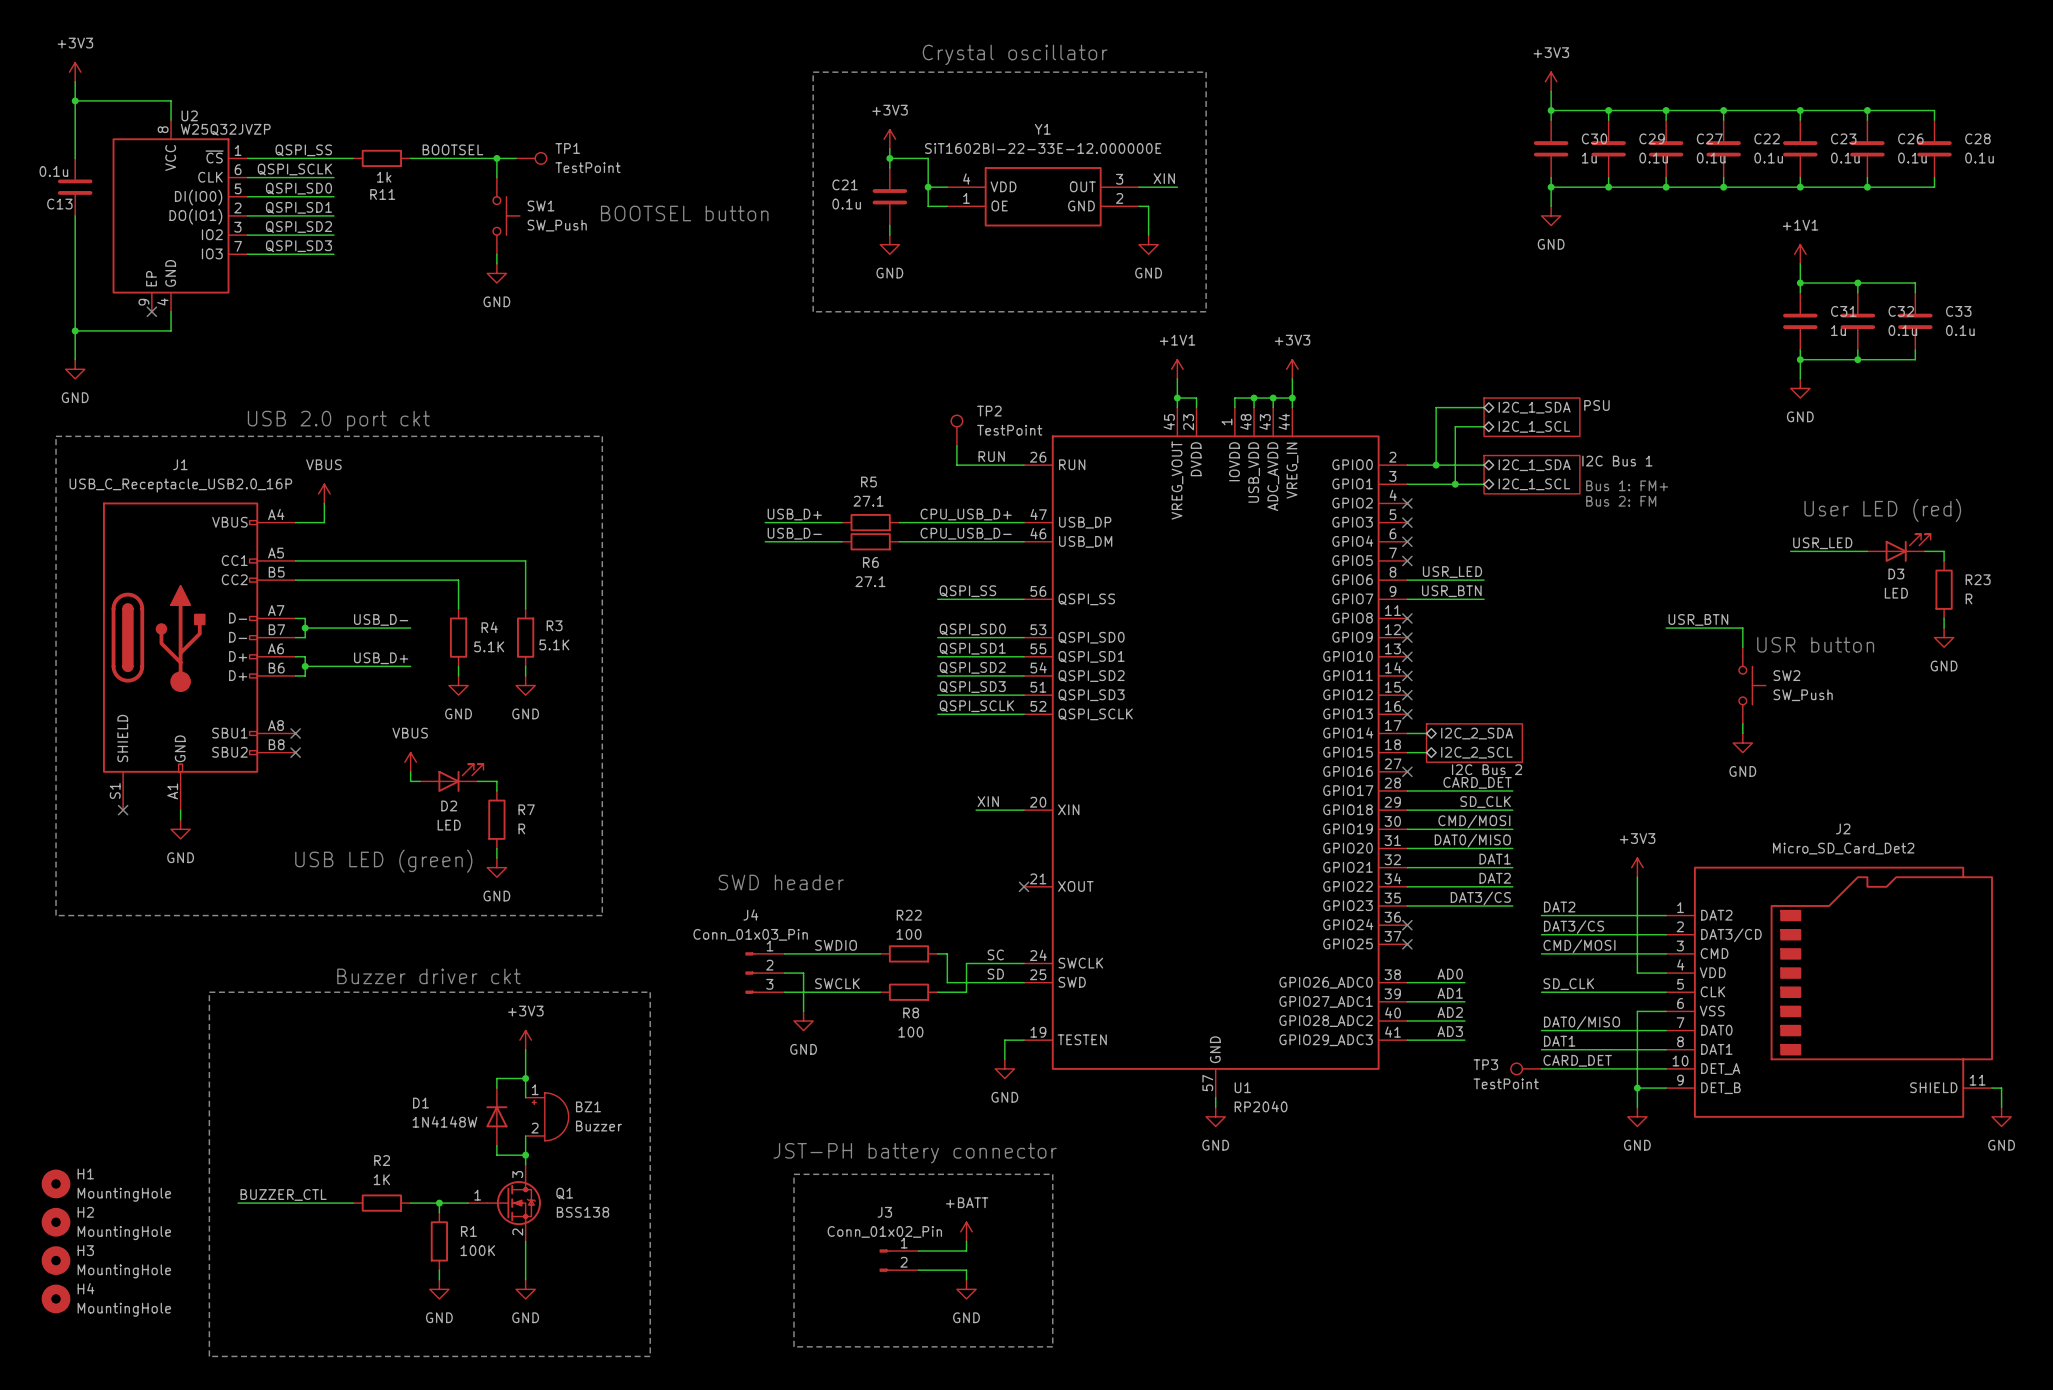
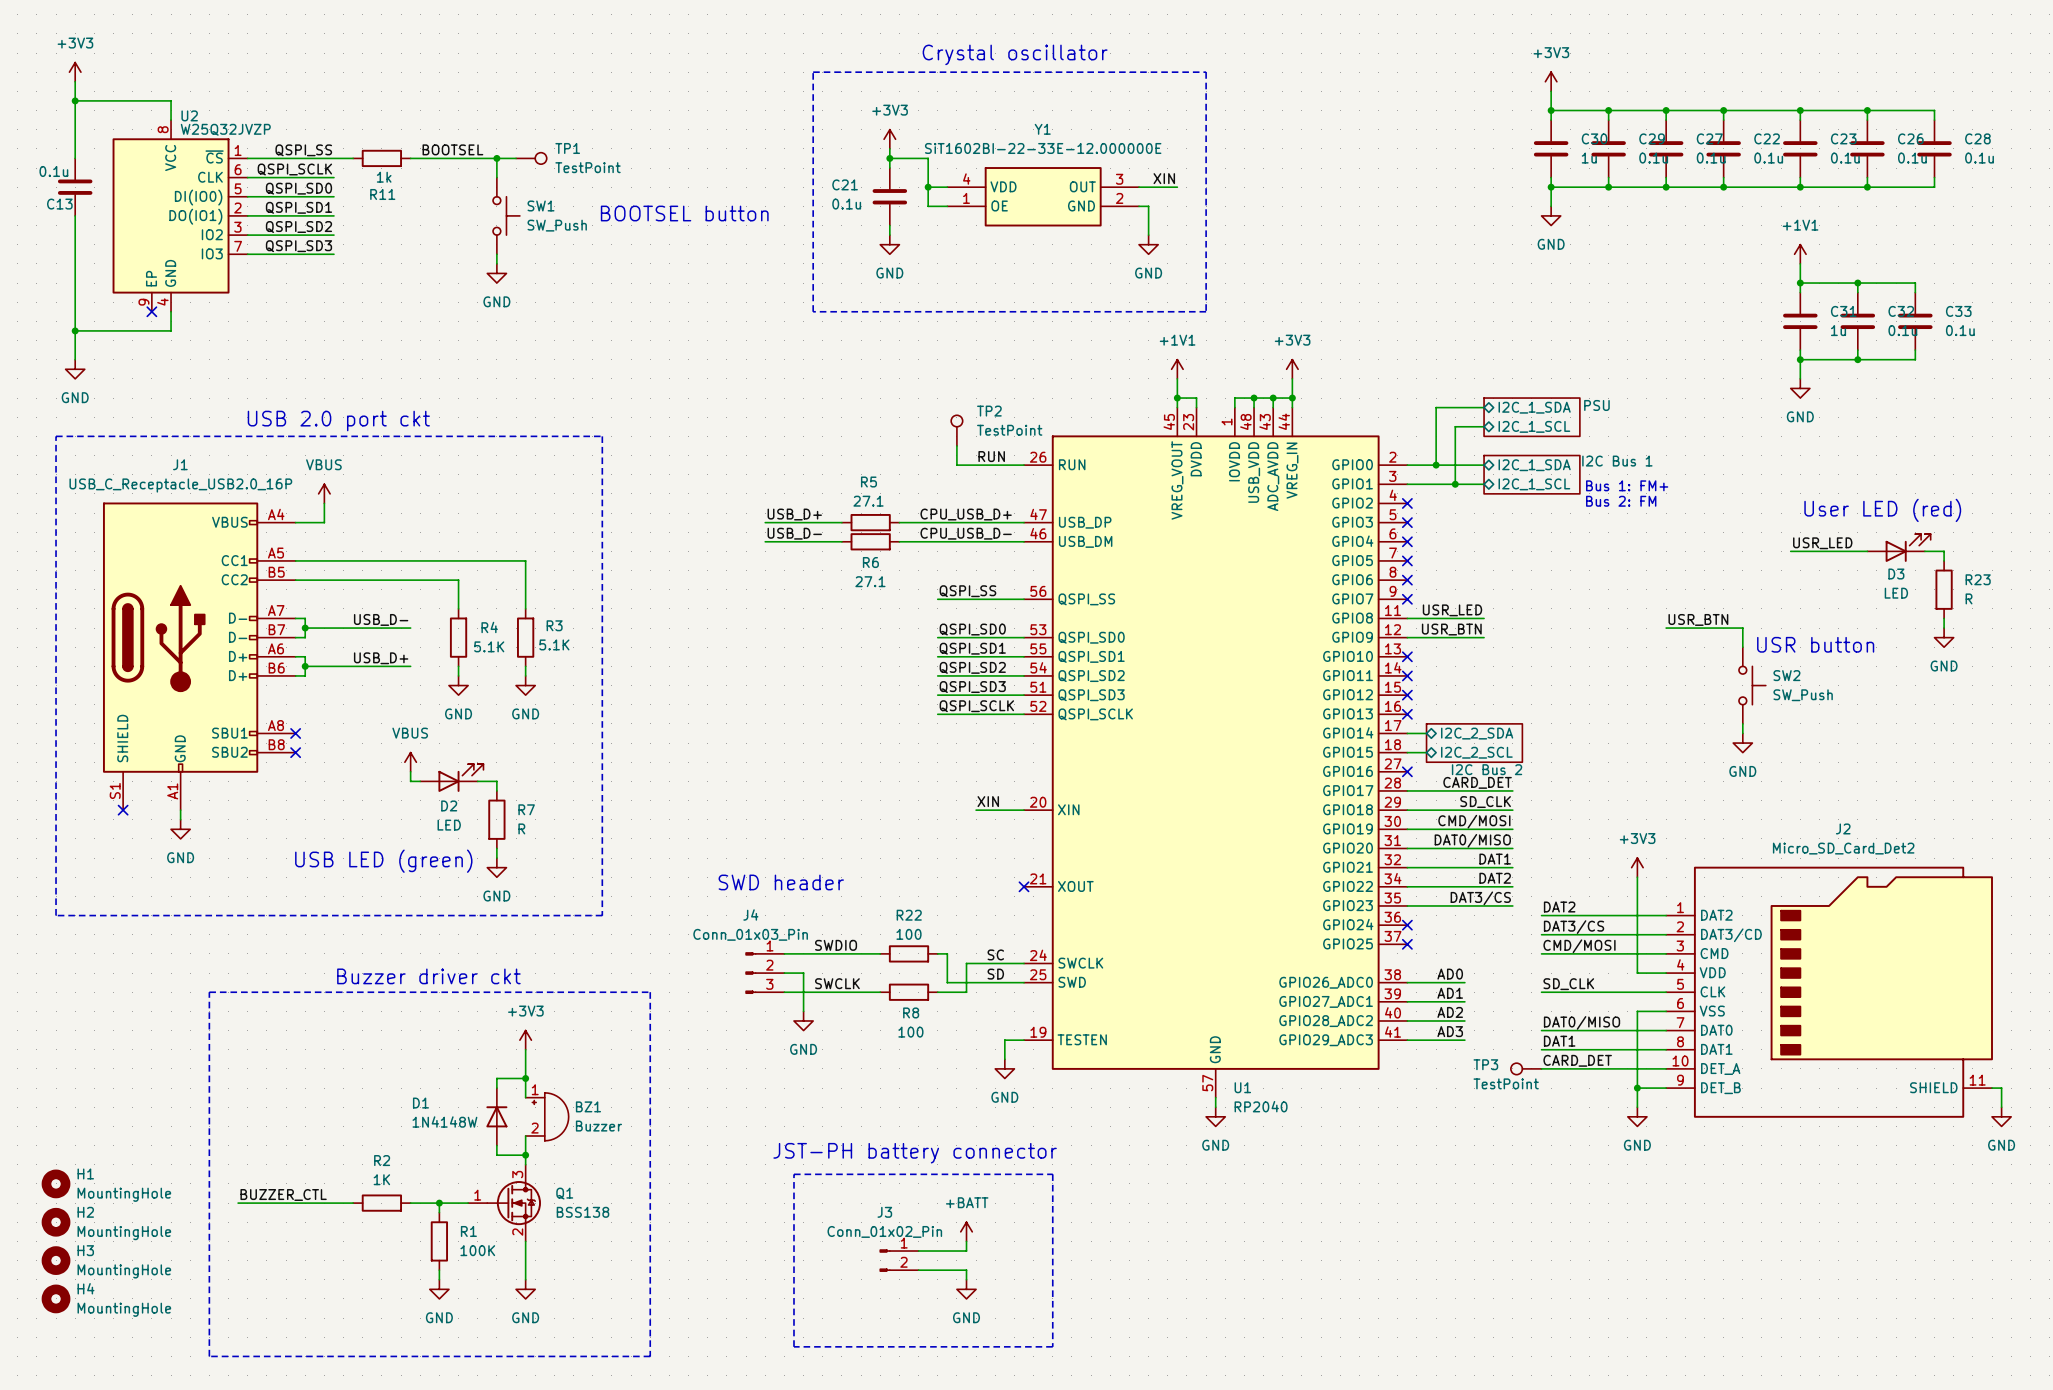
label position: USR_LED (1452, 572) -> USR_LED (1452, 610)
wire: (1407, 580) (1484, 580) -> (1407, 618) (1484, 618)
no-connect mark: none -> (1407, 580)
label position: USR_BTN (1451, 591) -> USR_BTN (1451, 629)
wire: (1407, 599) (1484, 599) -> (1407, 637) (1484, 637)
no-connect mark: none -> (1407, 599)
no-connect mark: (1407, 618) -> none
no-connect mark: (1407, 637) -> none

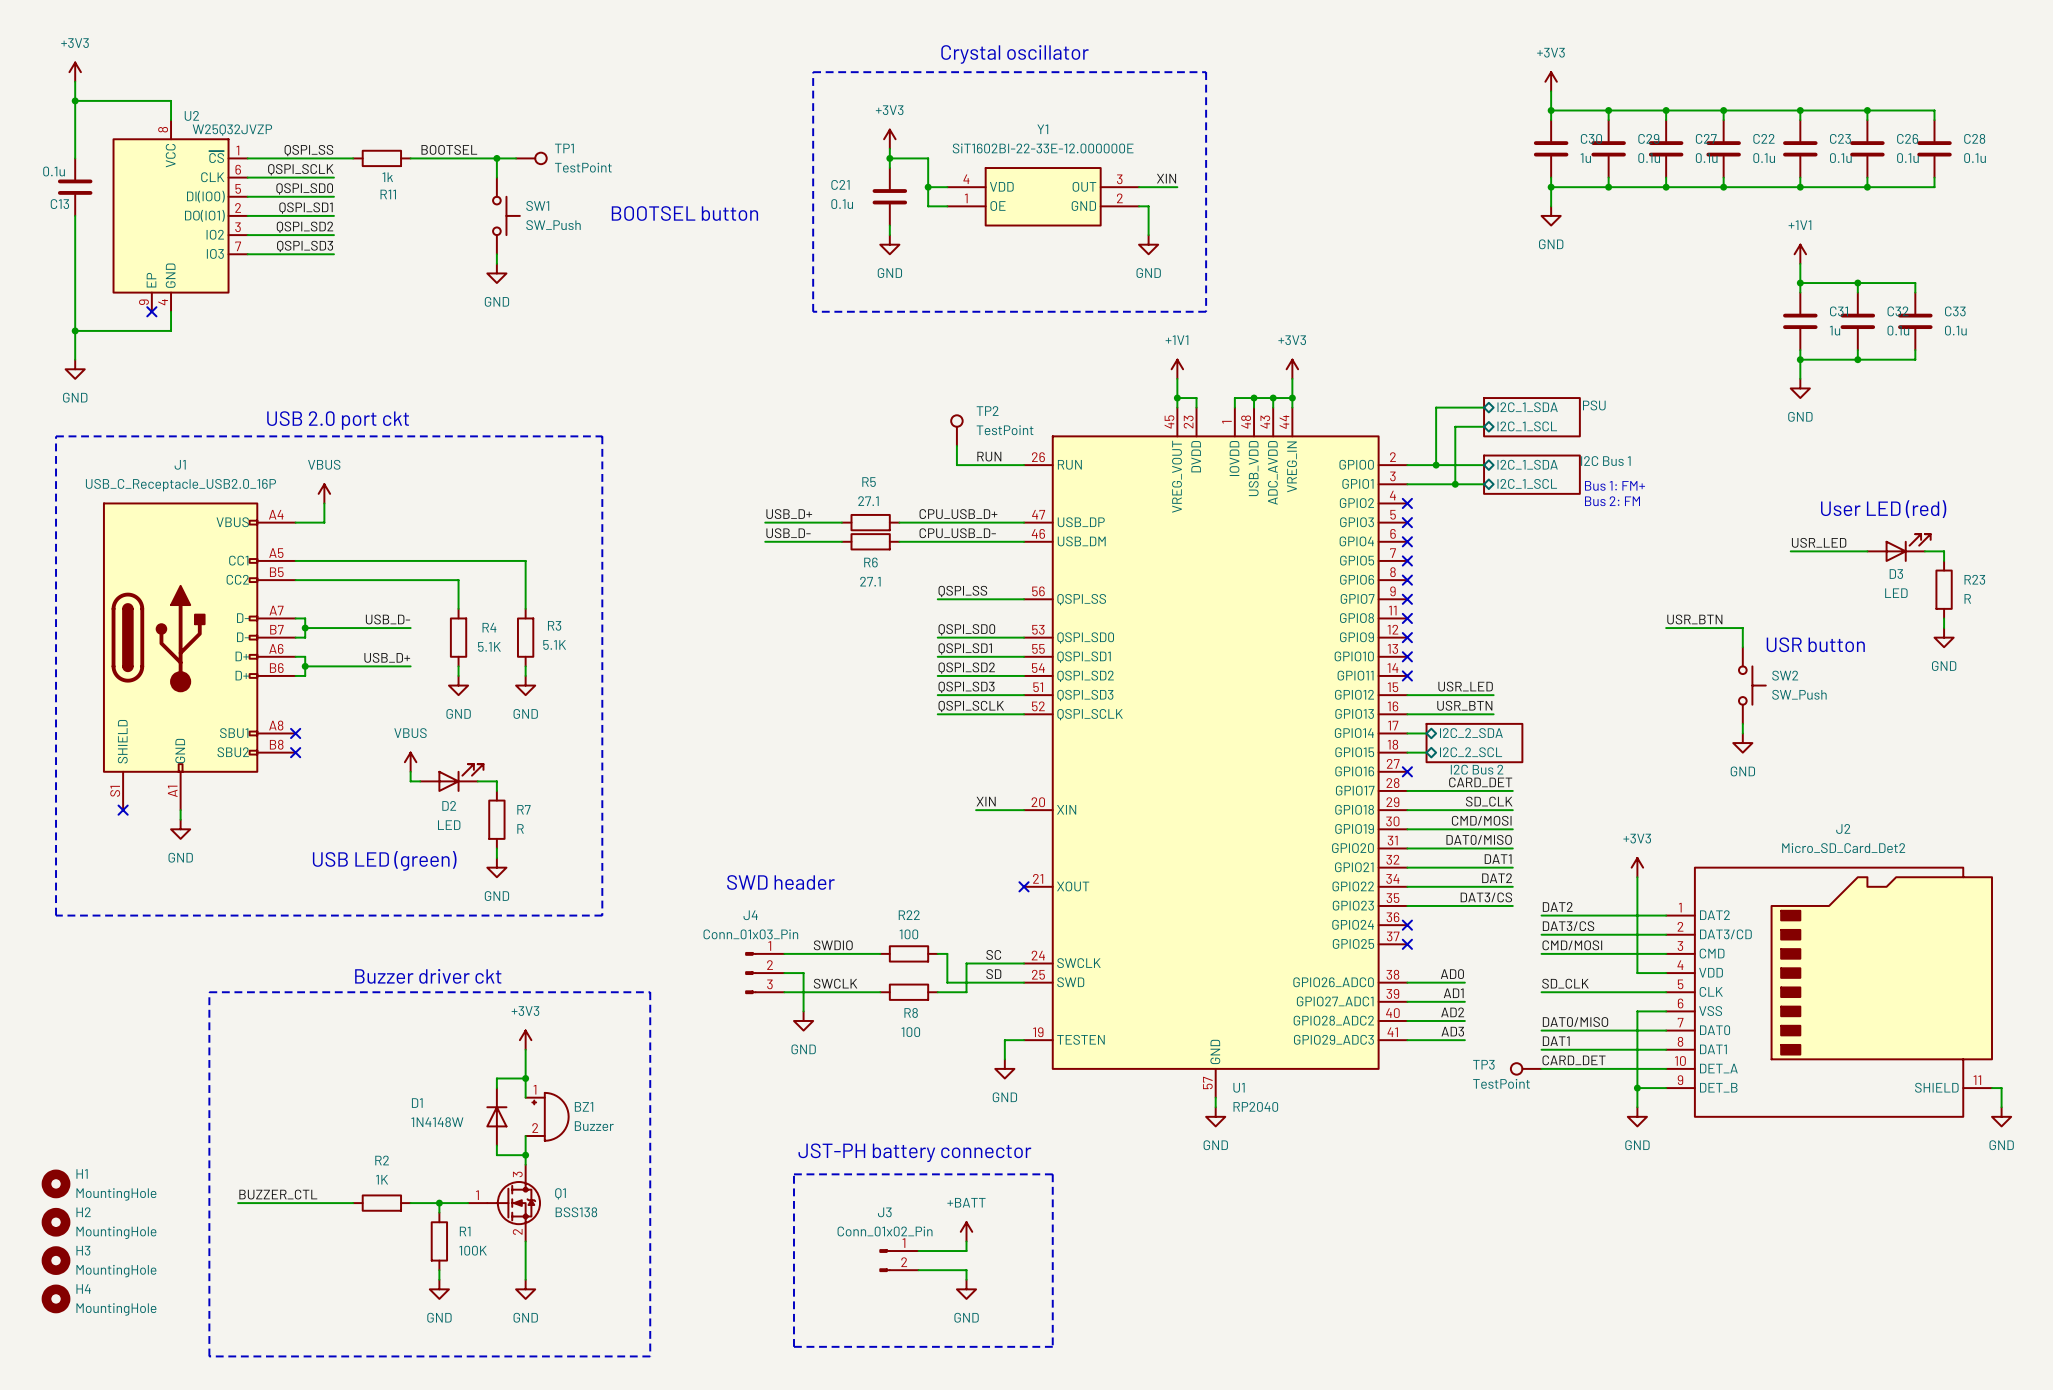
label position: USR_LED (1452, 610) -> USR_LED (1465, 686)
wire: (1407, 618) (1484, 618) -> none
no-connect mark: none -> (1407, 618)
label position: USR_BTN (1451, 629) -> USR_BTN (1464, 705)
wire: (1407, 637) (1484, 637) -> none
no-connect mark: none -> (1407, 637)
wire: none -> (1407, 695) (1493, 695)
no-connect mark: (1407, 695) -> none
wire: none -> (1407, 714) (1493, 714)
no-connect mark: (1407, 714) -> none

